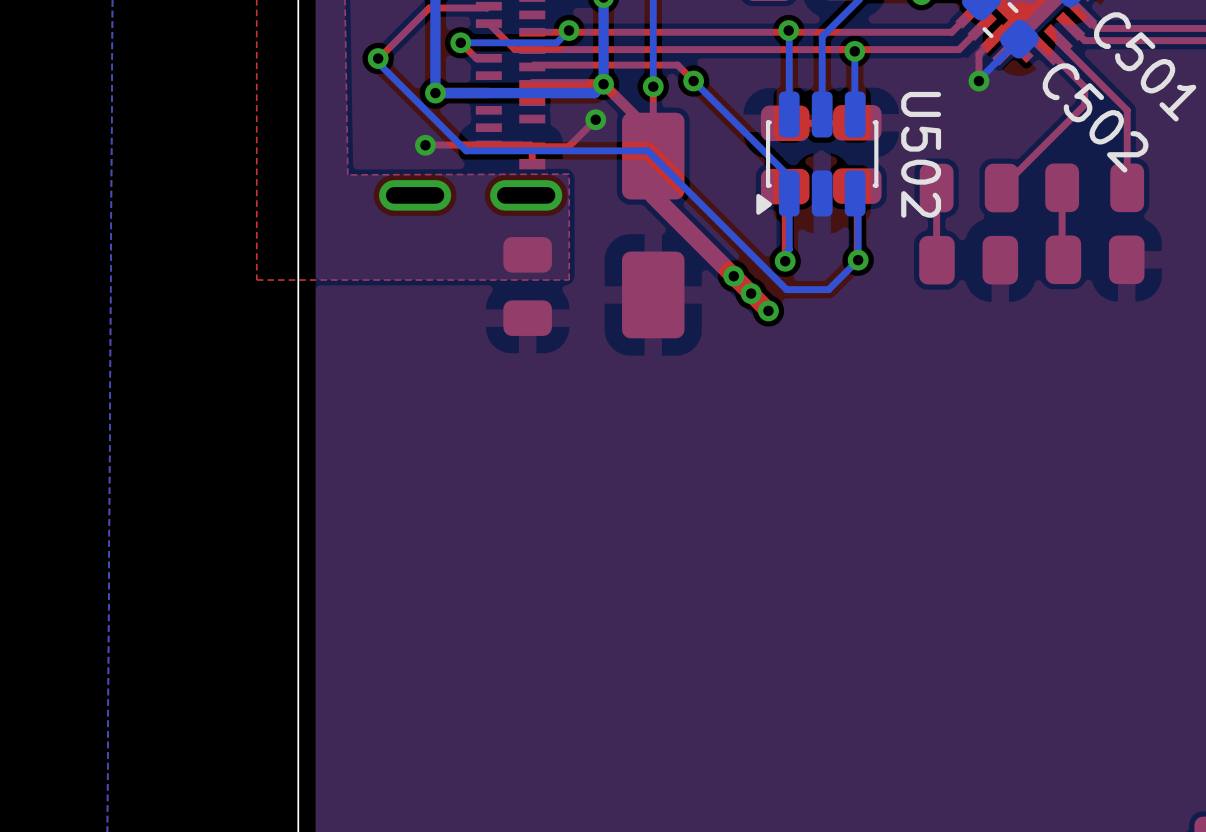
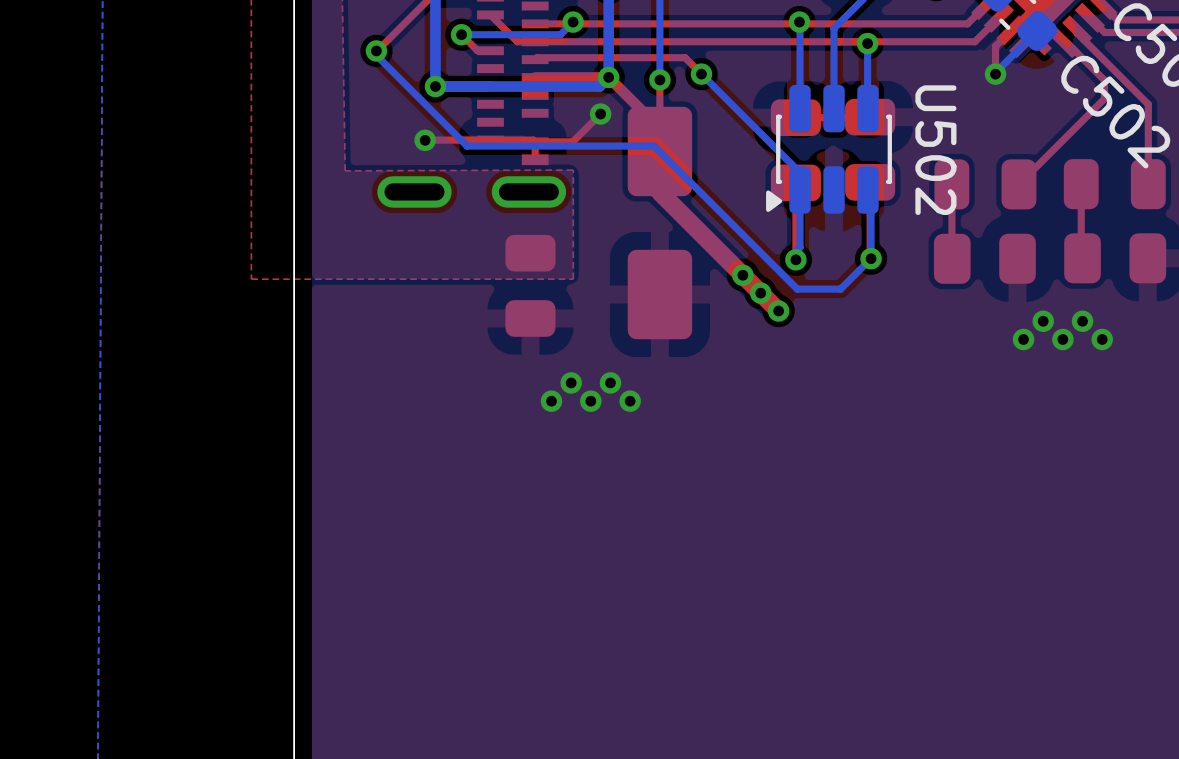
via: none -> (1043, 321)
via: none -> (1082, 321)
via: none -> (1023, 339)
via: none -> (1062, 339)
via: none -> (1102, 339)
via: none -> (571, 382)
via: none -> (610, 382)
via: none -> (551, 401)
via: none -> (590, 401)
via: none -> (630, 401)

